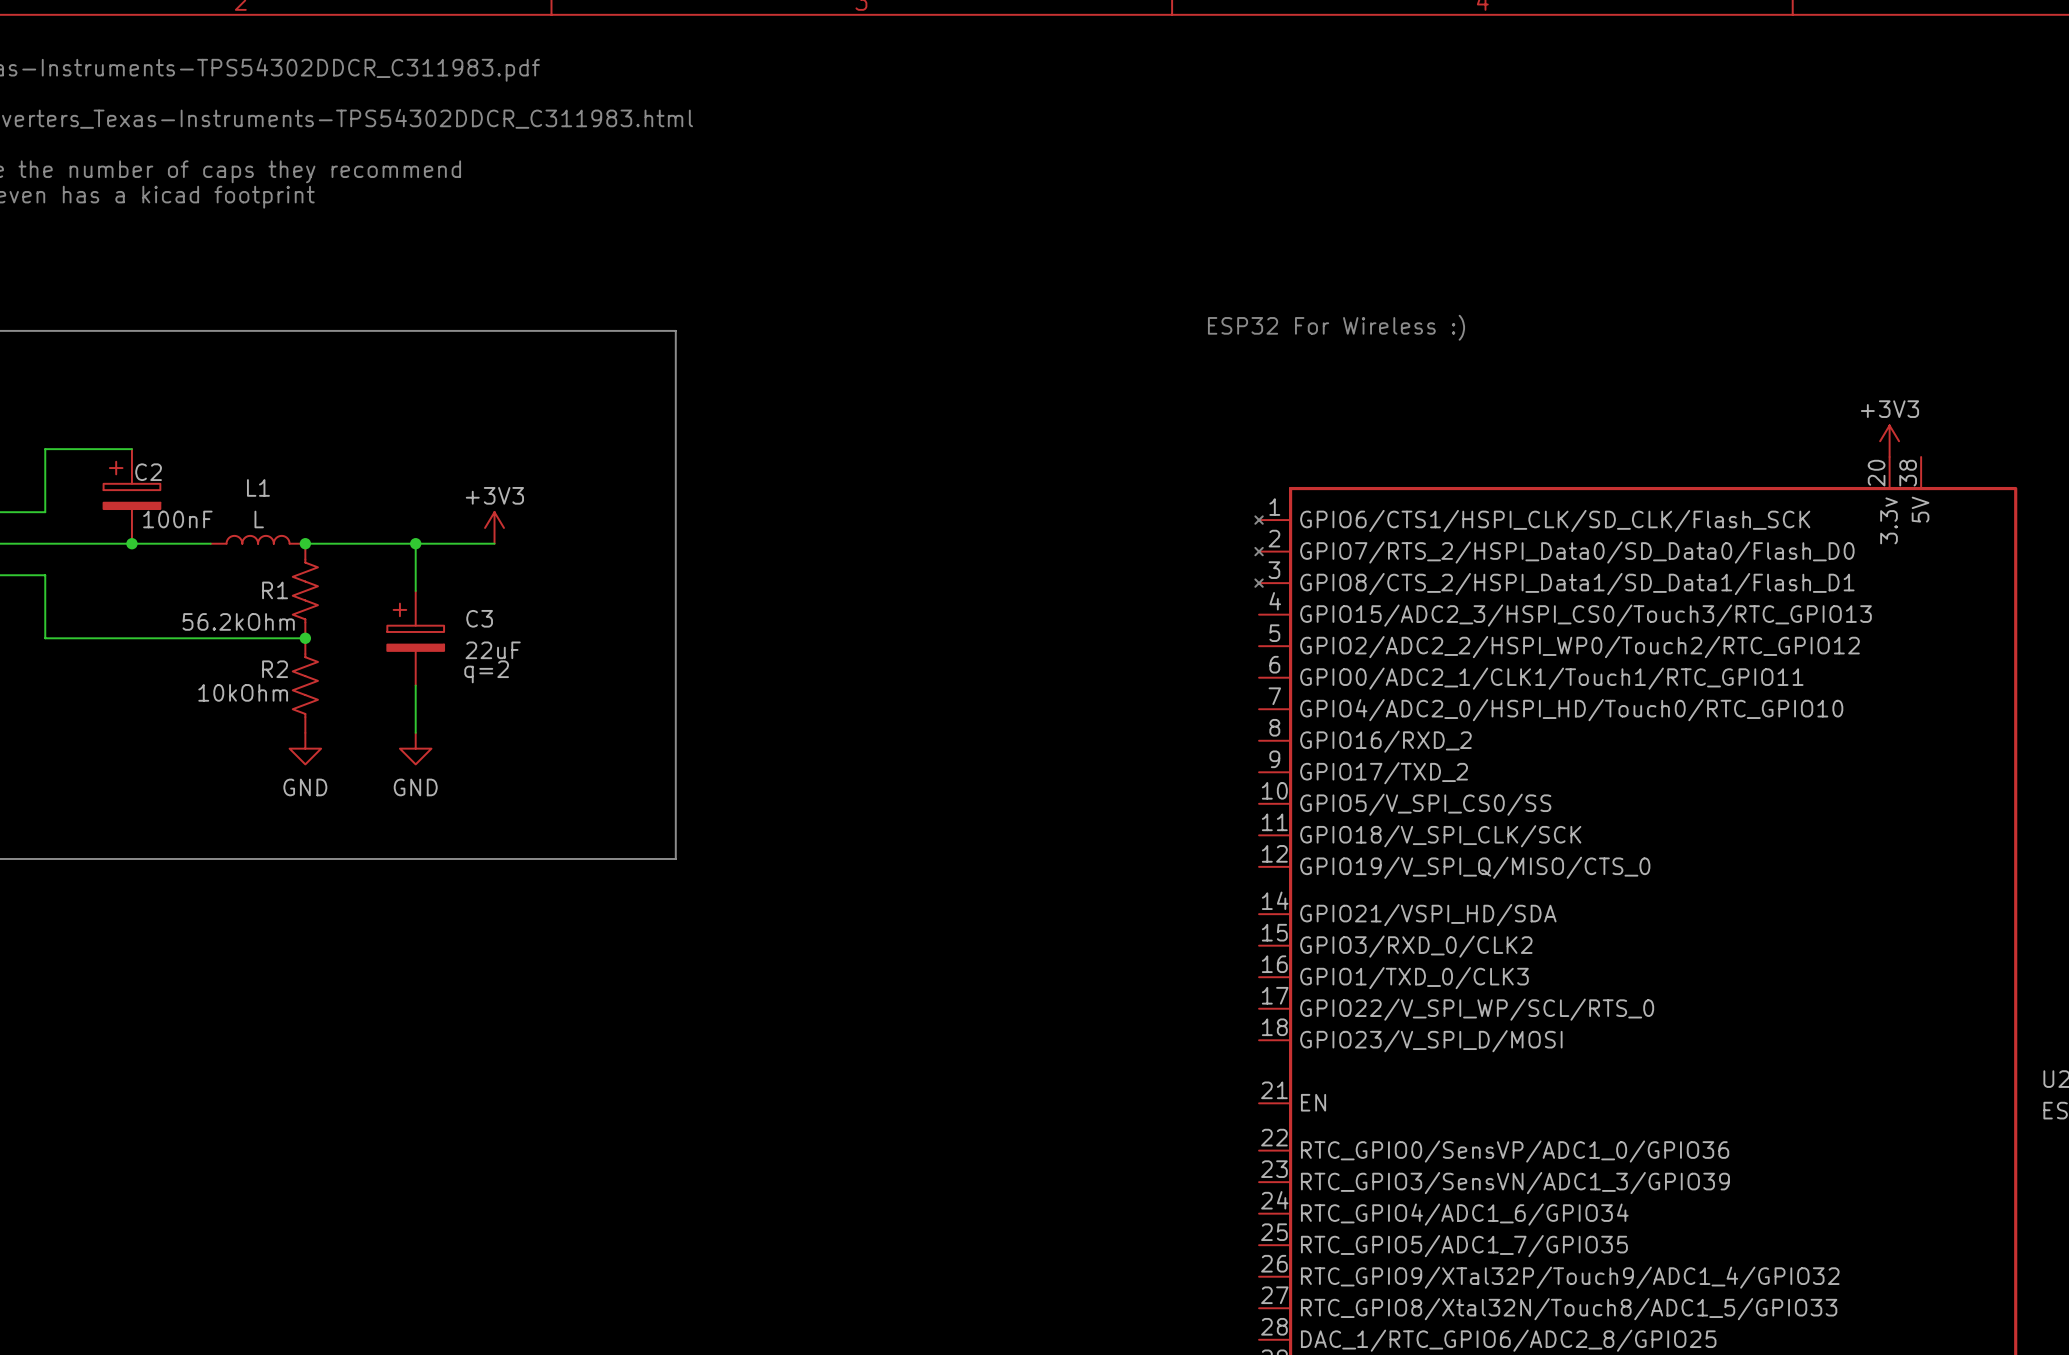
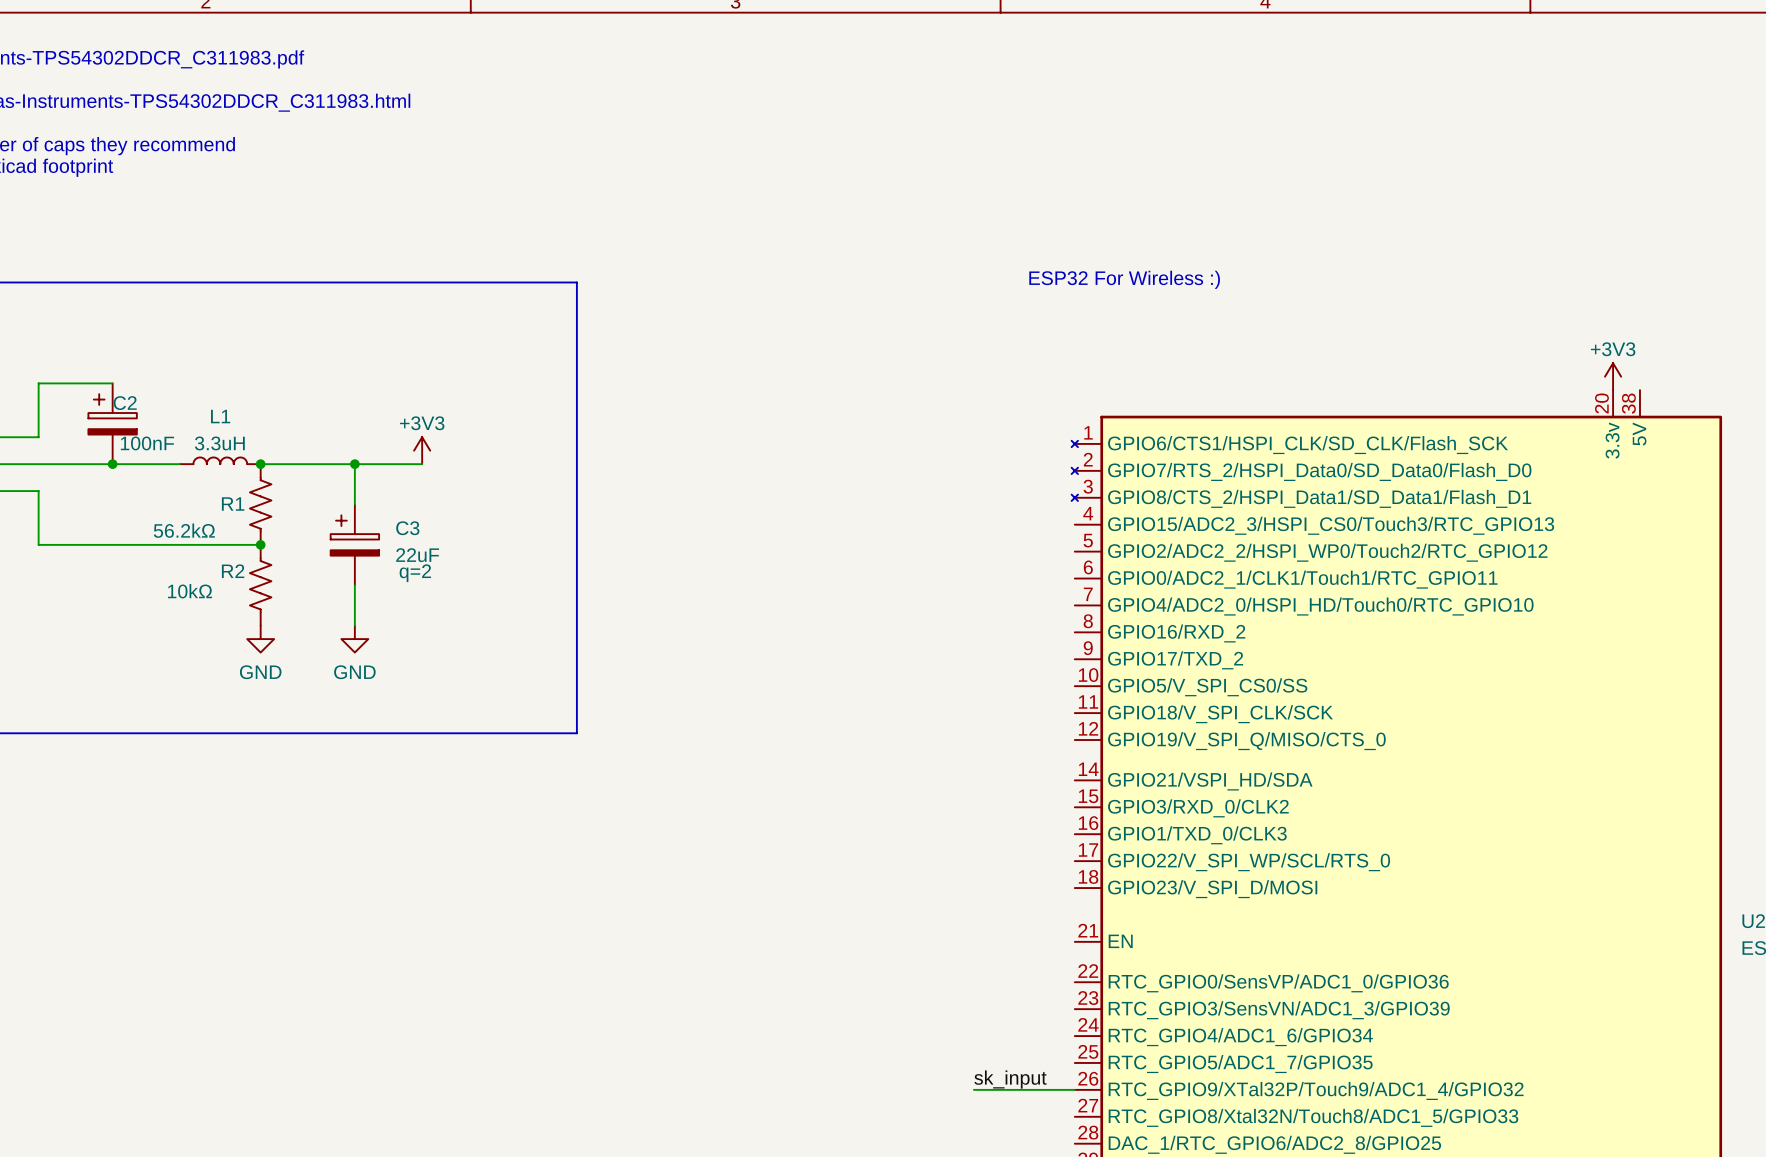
L1 value: L (259, 519) -> 3.3uH (219, 443)
R1 value: 56.2kOhm (238, 621) -> 56.2kΩ (184, 530)
R2 value: 10kOhm (243, 692) -> 10kΩ (189, 591)
label: none -> sk_input (1010, 1079)
wire: none -> (973, 1089) (1074, 1089)

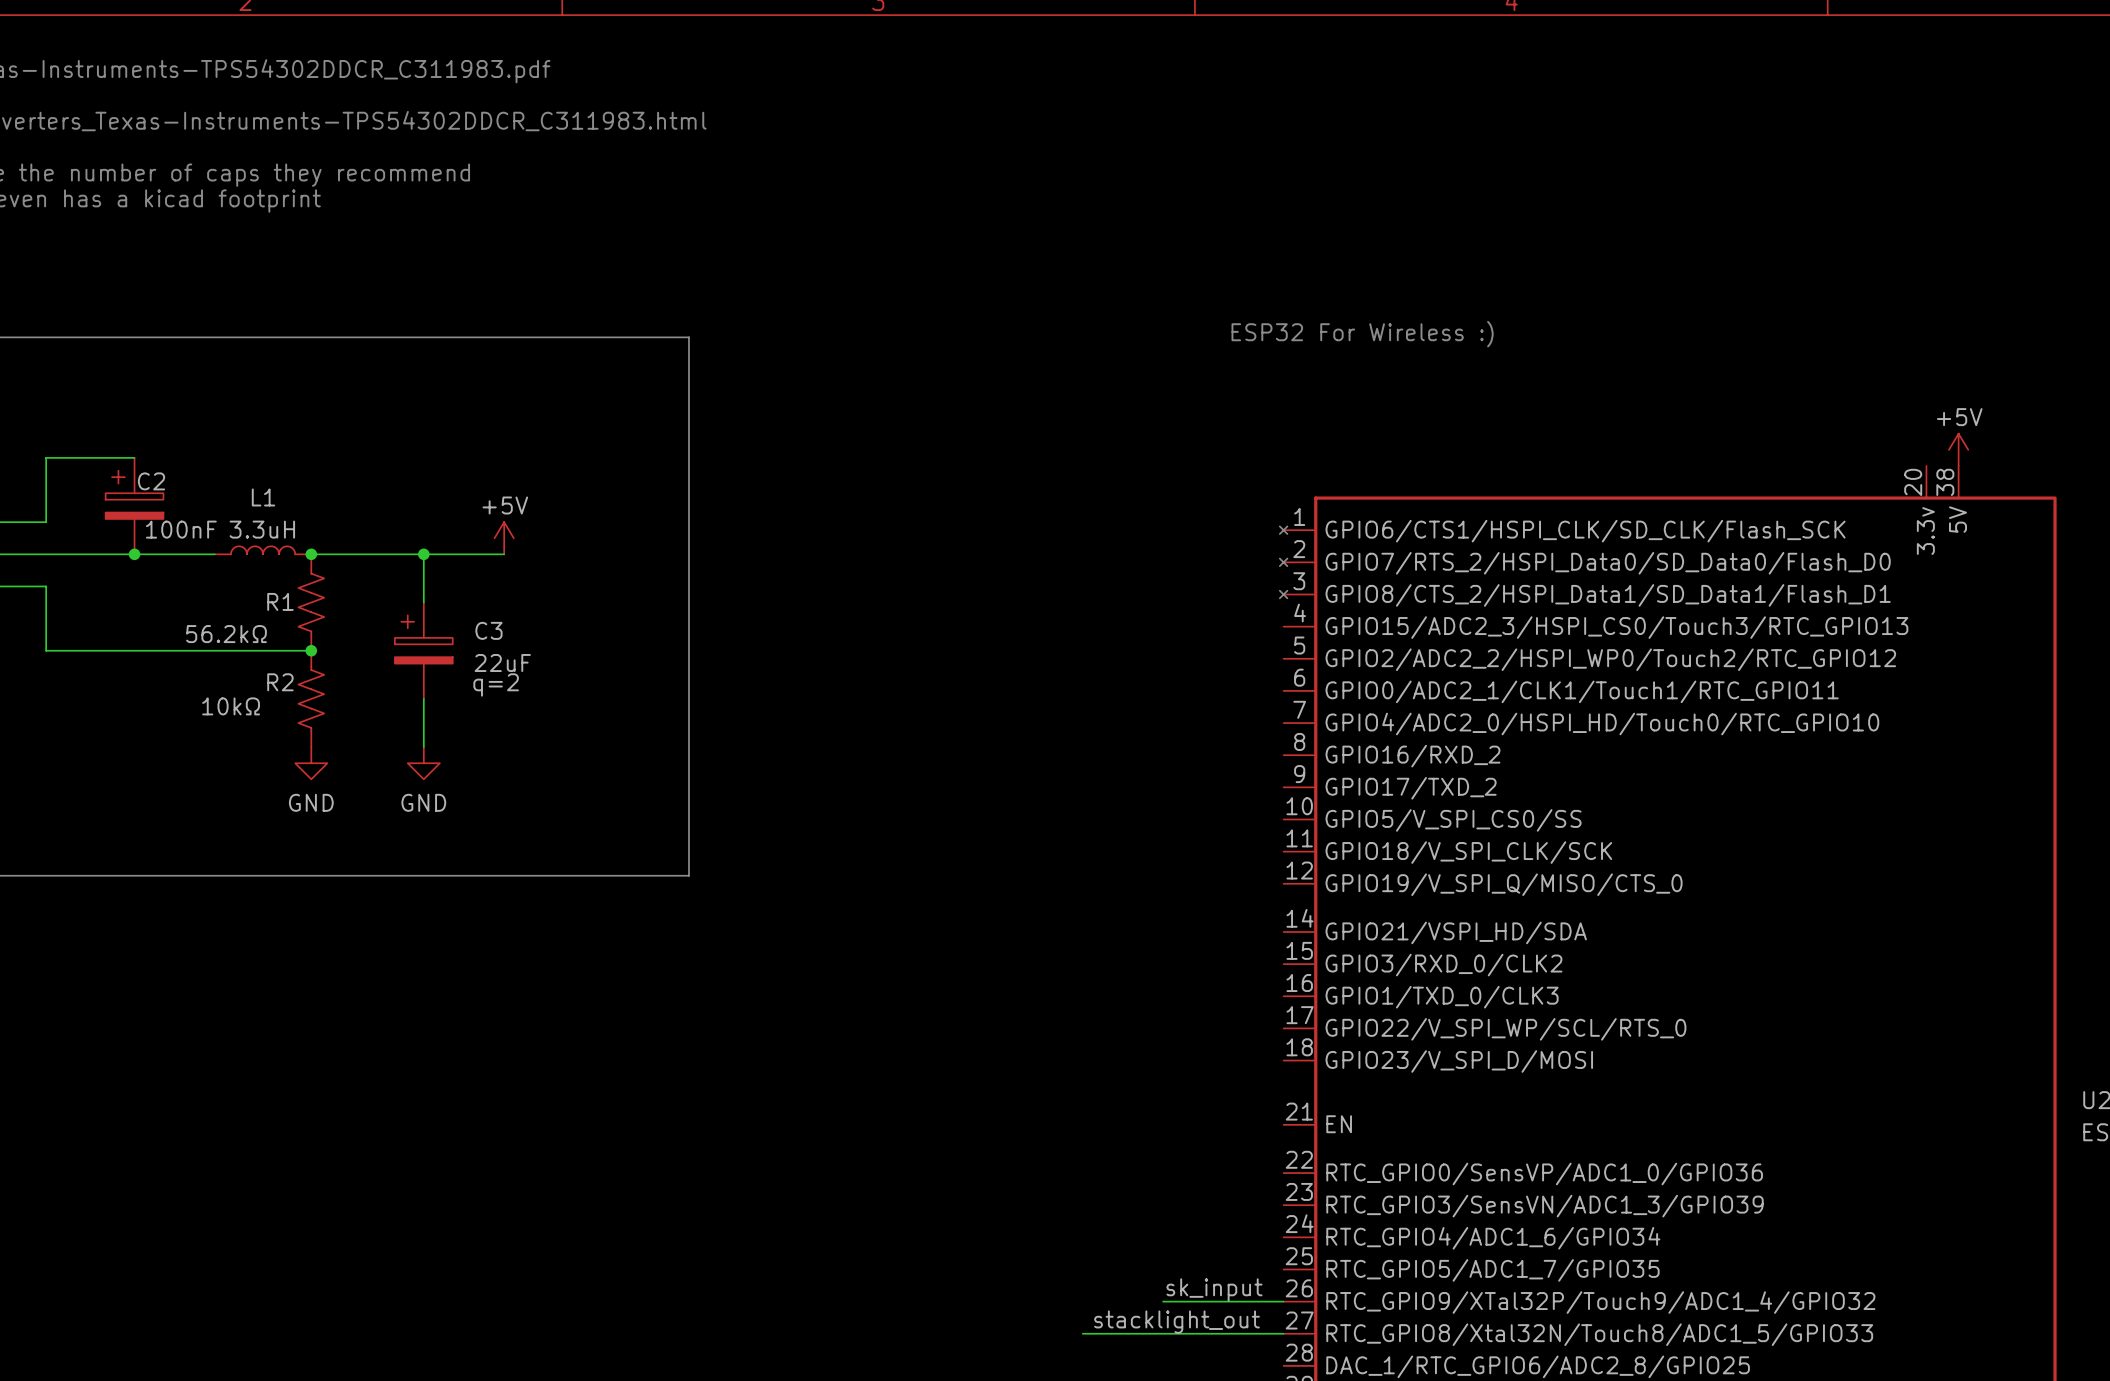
power symbol: +3V3 (1613, 376) -> none
power symbol: none -> +5V (1958, 449)
power symbol: +3V3 (422, 450) -> +5V (504, 538)
label: none -> stacklight_out (1176, 1322)
wire: none -> (1082, 1333) (1283, 1333)

